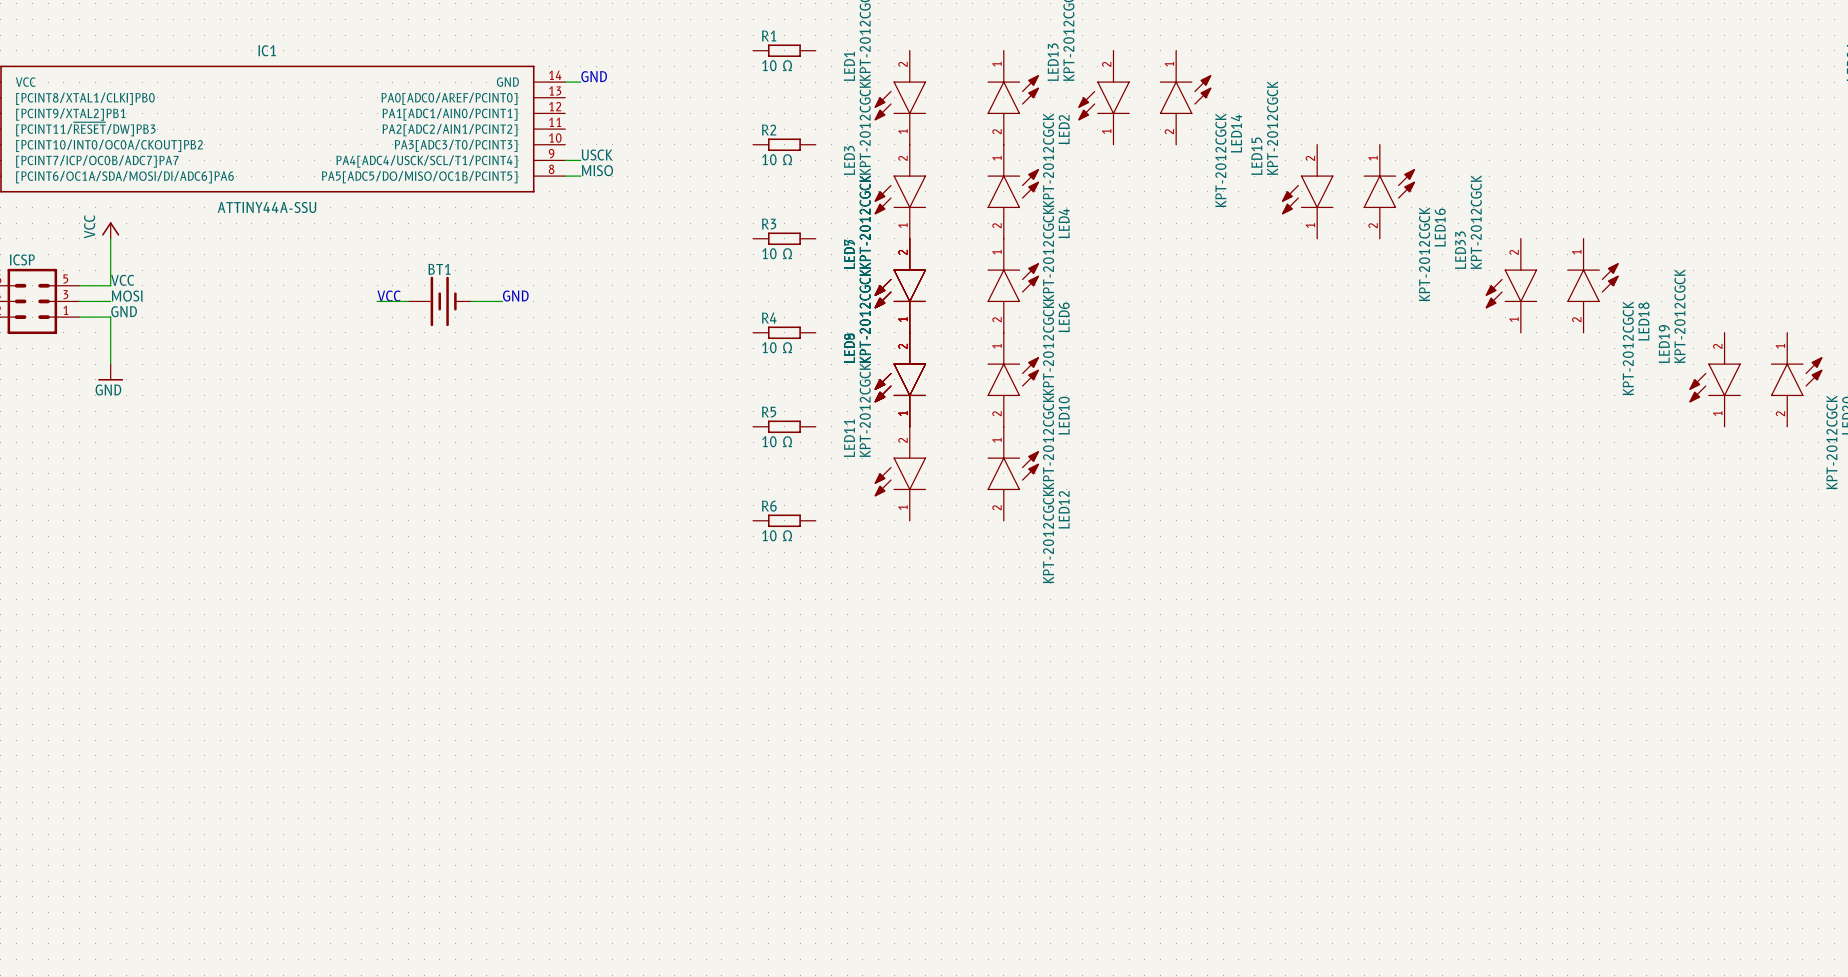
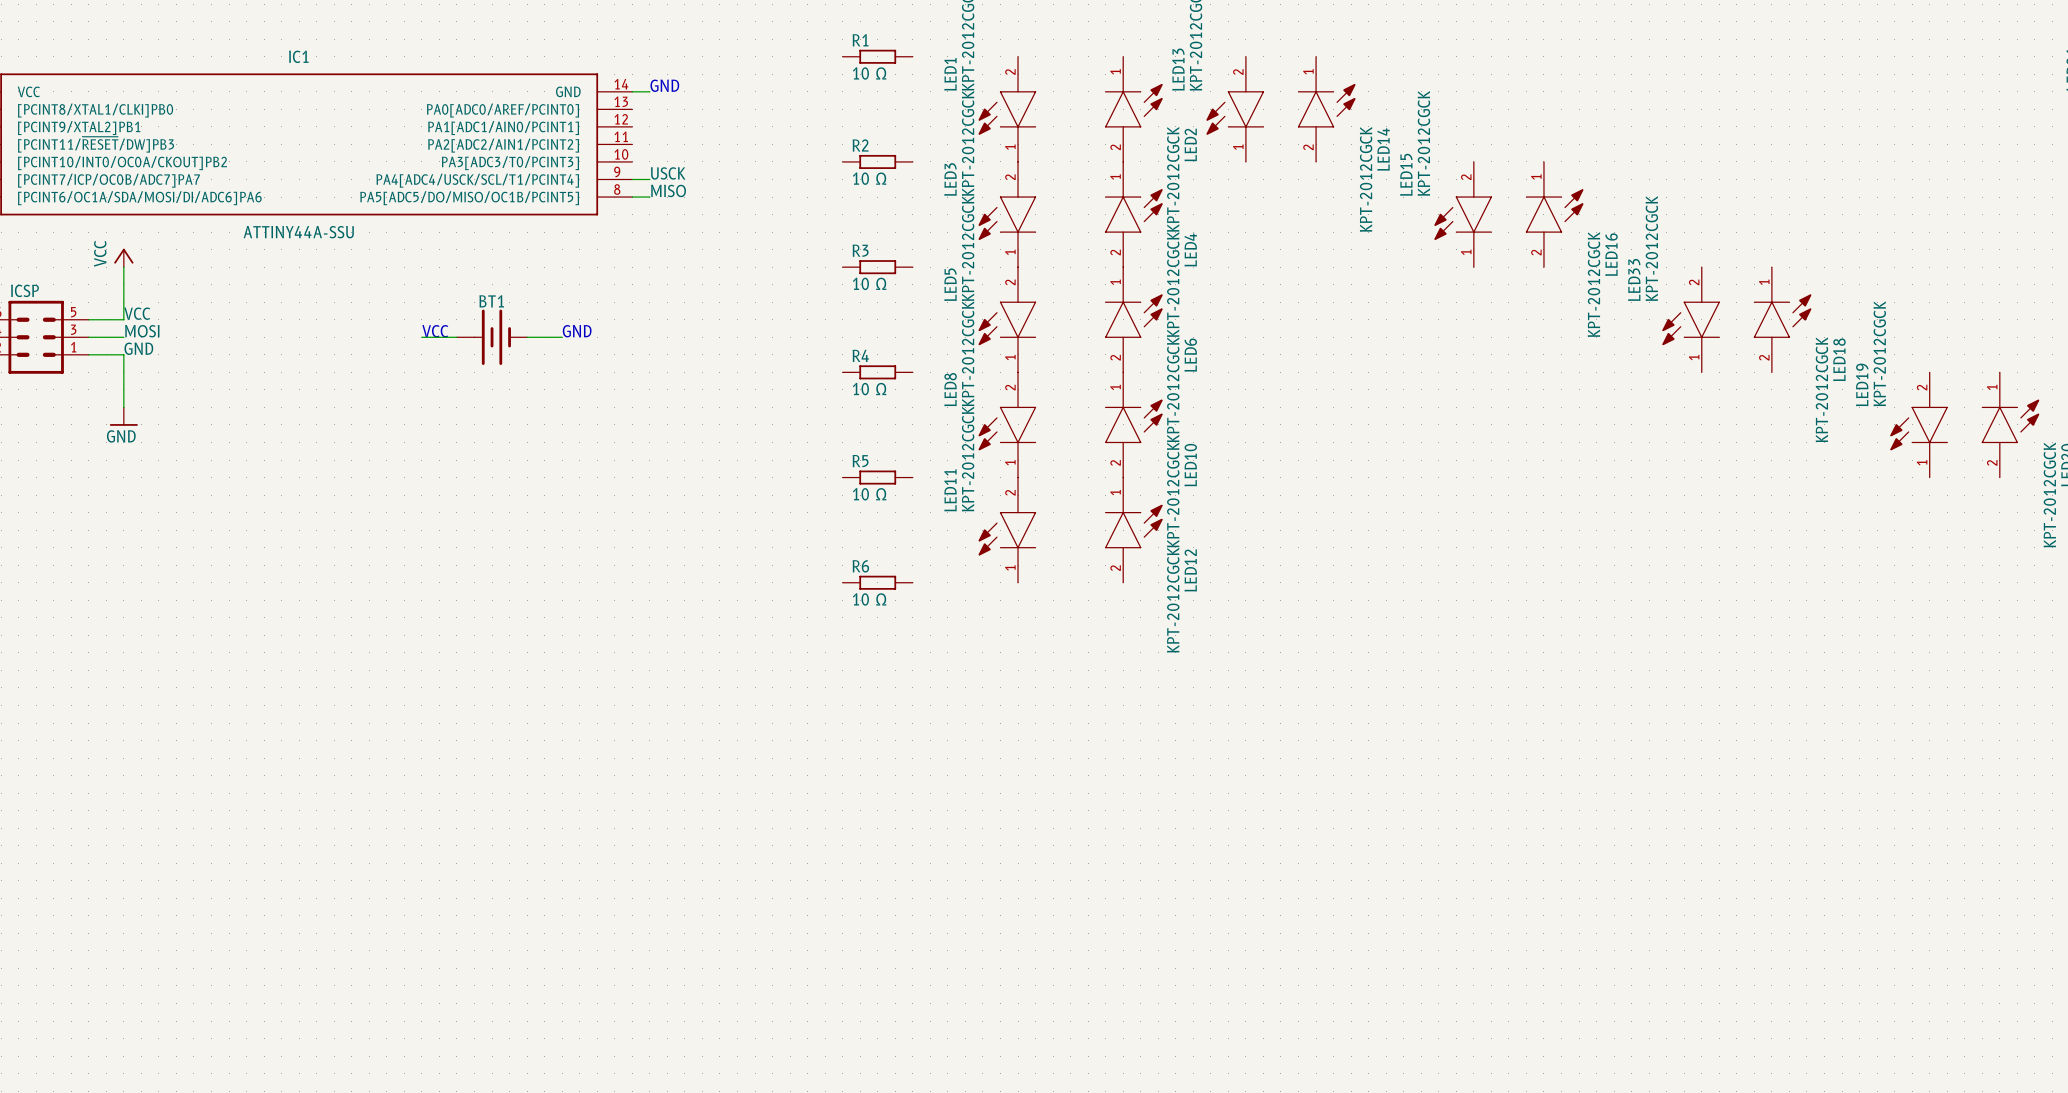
part: KPT-2012CGCK (900, 285) -> none
part: KPT-2012CGCK (900, 379) -> none

